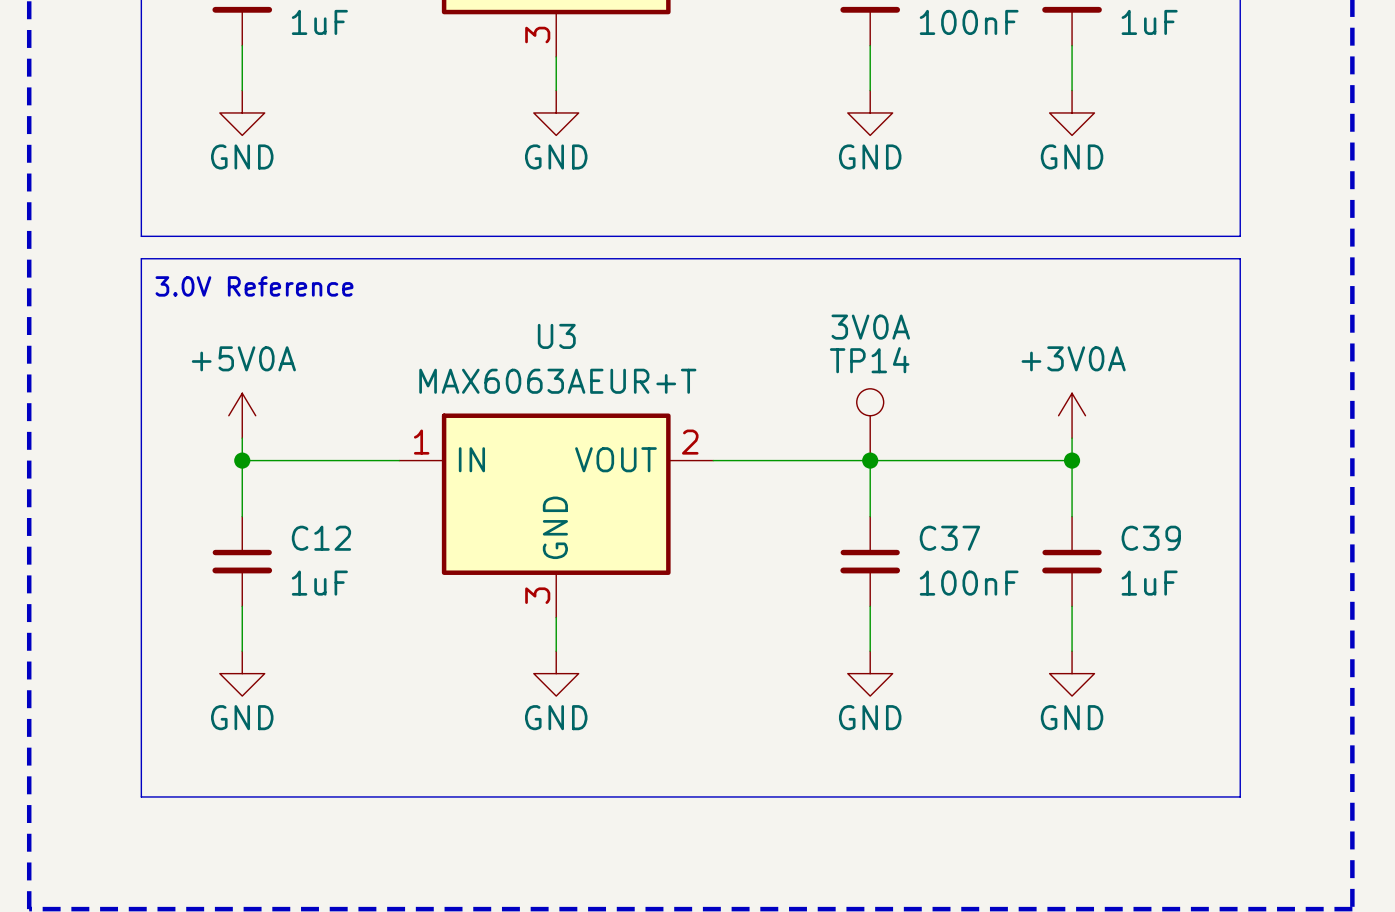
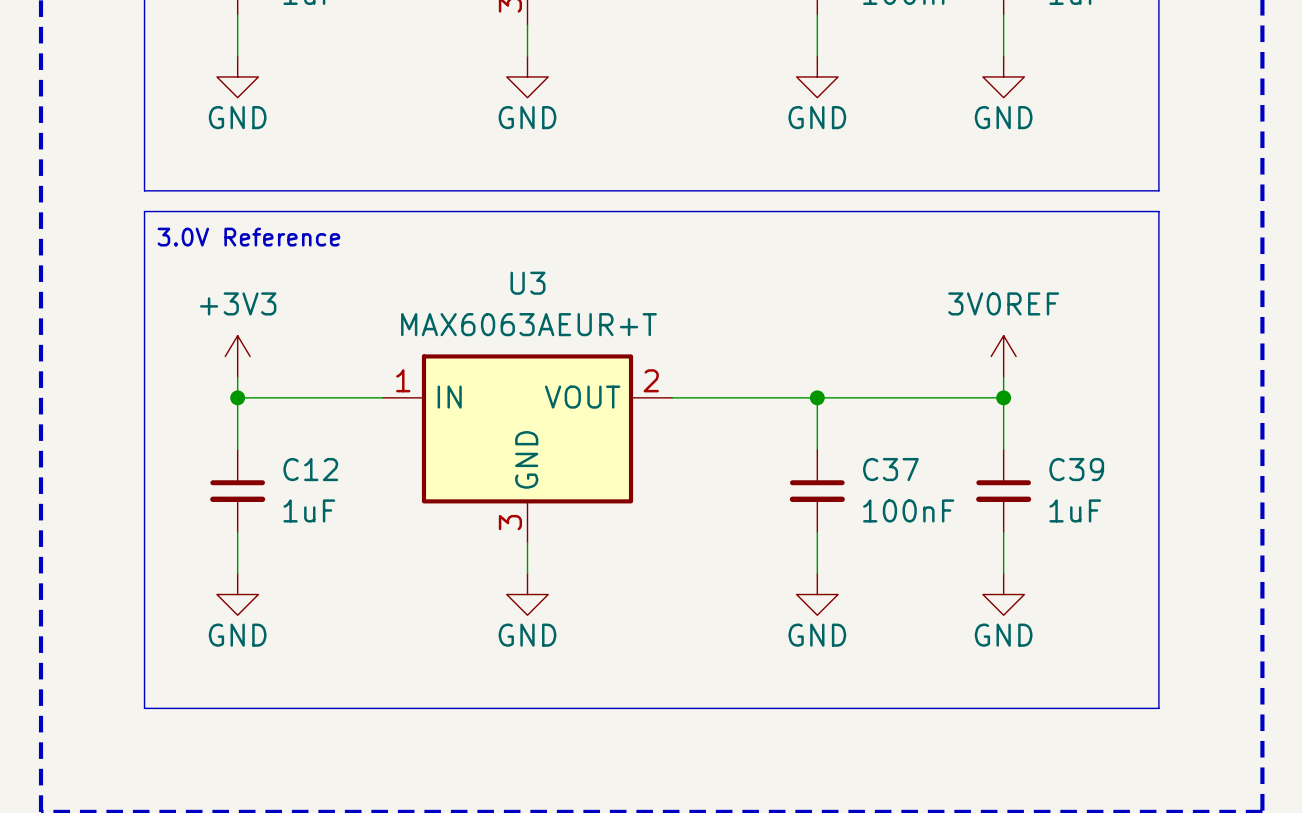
power symbol: +5V0A (242, 415) -> +3V3 (237, 356)
power symbol: +3V0A (1072, 415) -> 3V0REF (1003, 356)
TP14: 3V0A (870, 424) -> none

